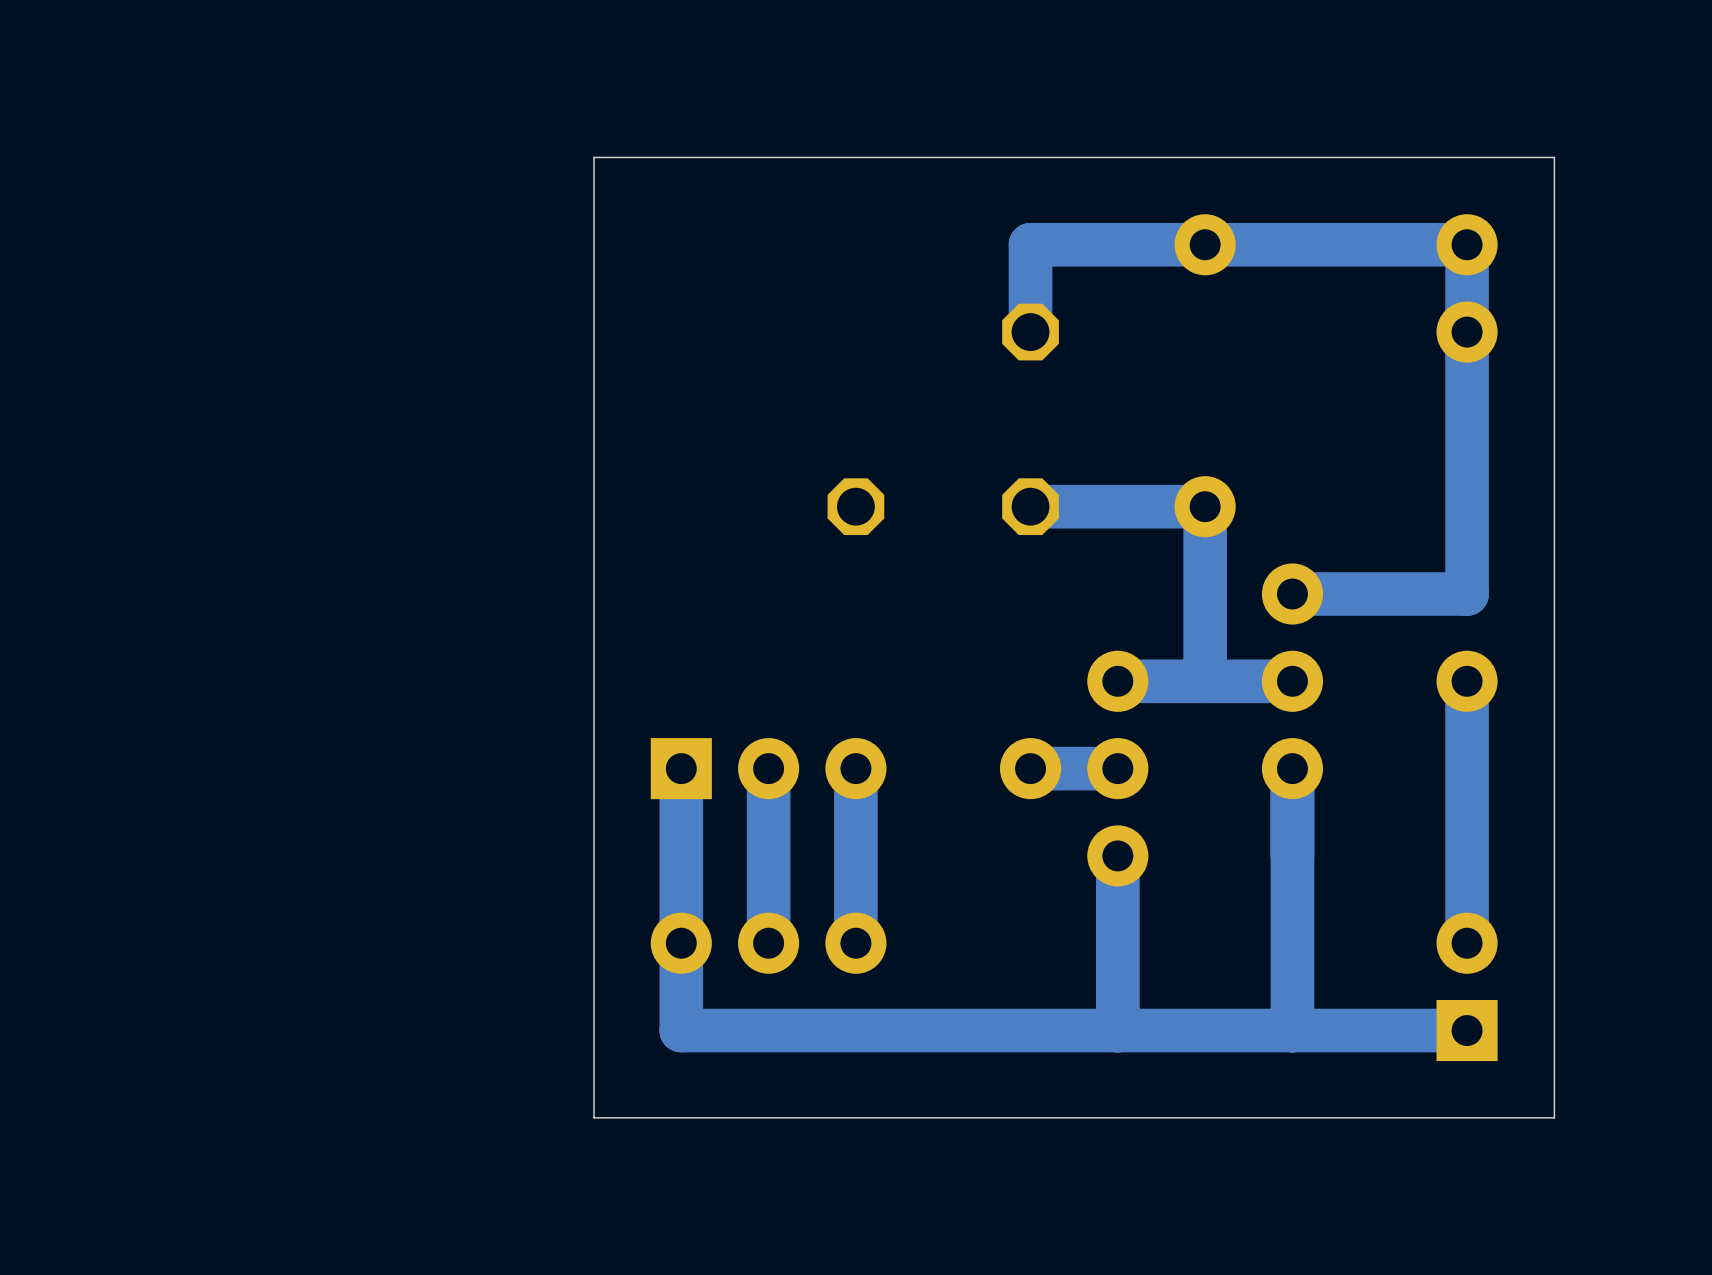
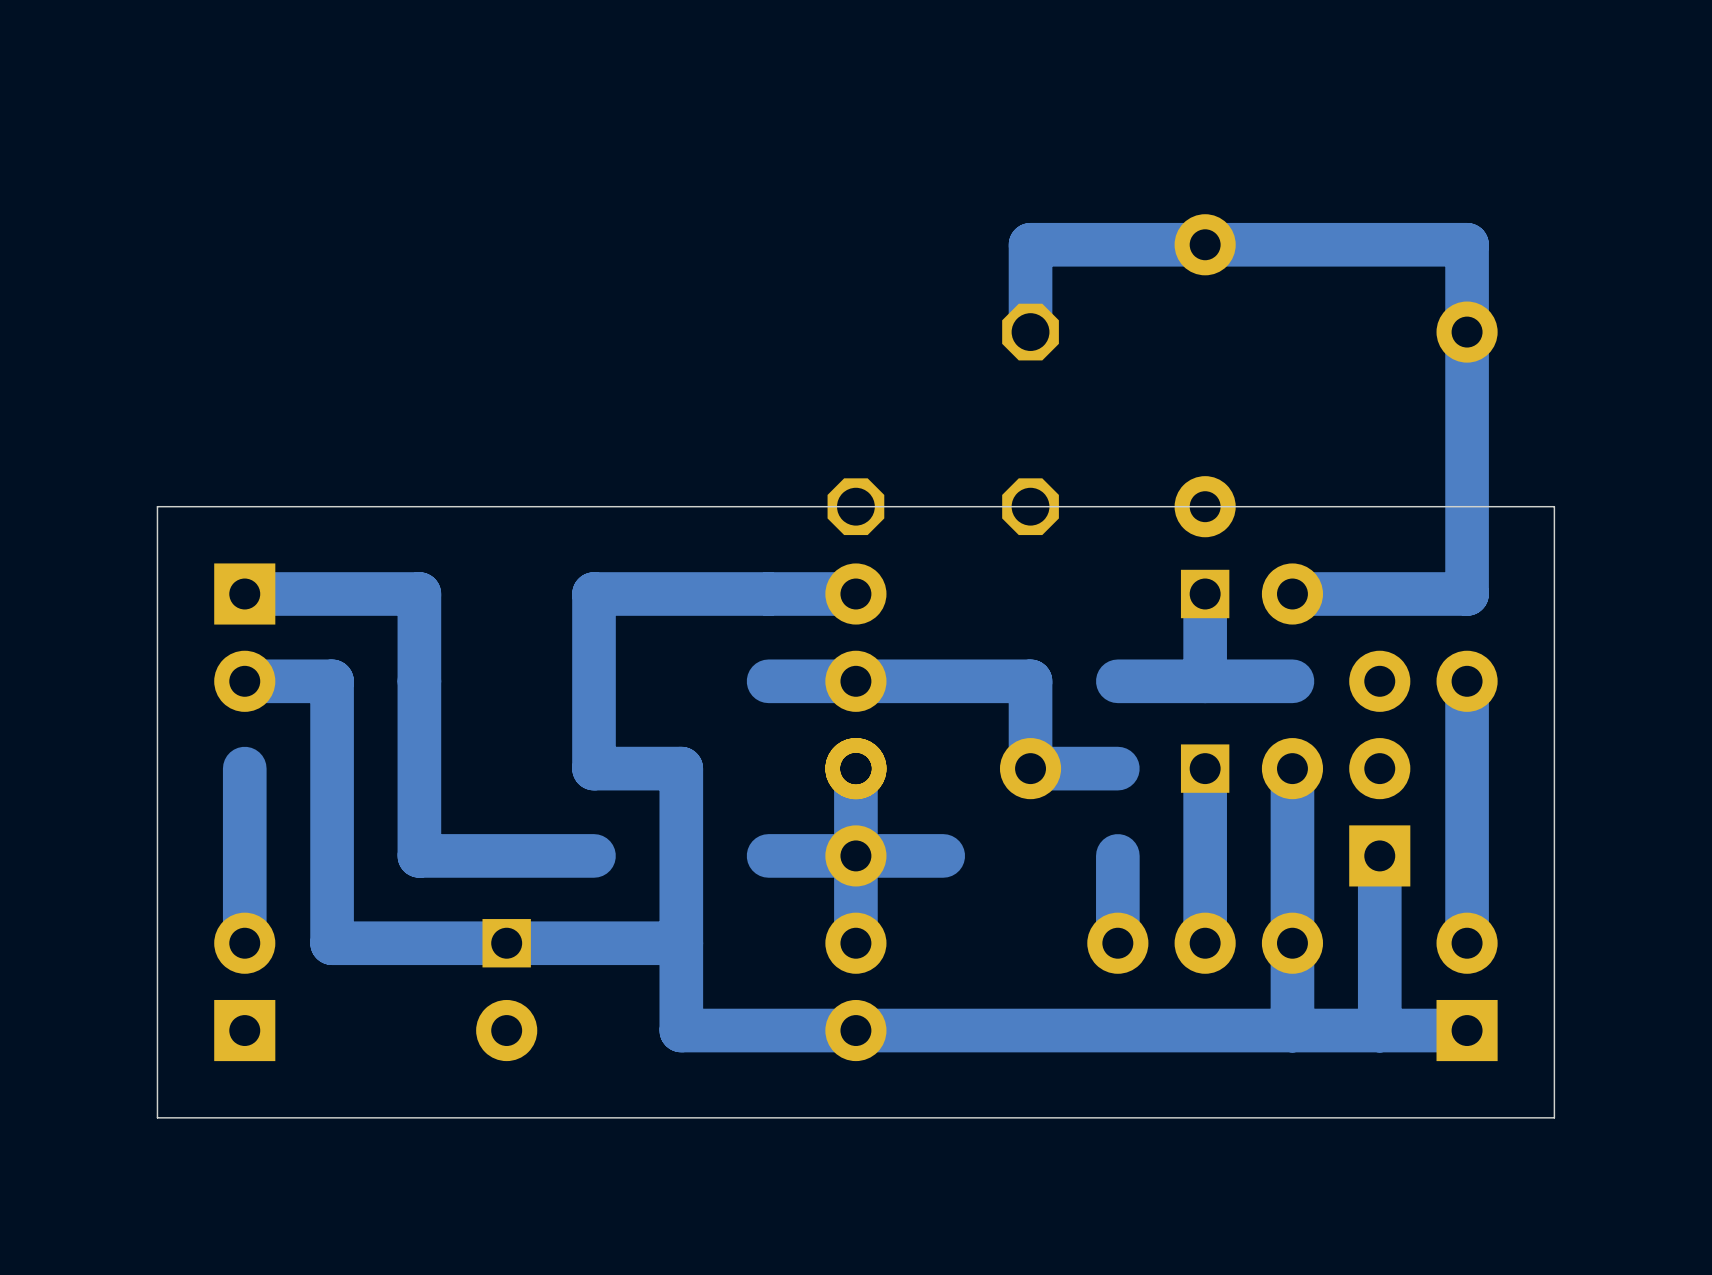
part: (1467, 244) -> none
bottom track: (1030, 506) (1205, 506) (1205, 593) -> none
board edge: (1554, 506) (1554, 157) (593, 157) (593, 1117) -> (1554, 506) (157, 506) (157, 1117) (593, 1117)
bottom track: none -> (244, 593) (419, 593) (419, 855) (593, 855)
bottom track: none -> (855, 593) (593, 593) (593, 768) (681, 768)
part: none -> (1251, 593)
part: none -> (244, 637)
bottom track: none -> (244, 681) (332, 681) (332, 943) (681, 943)
bottom track: none -> (768, 681) (1030, 681) (1030, 768)
part: none -> (855, 681)
part: (1292, 681) -> none
bottom track: none -> (244, 768) (244, 943)
part: (724, 768) -> none
bottom track: (768, 768) (768, 943) -> (1205, 768) (1205, 943)
part: (1117, 768) -> none
part: none -> (1251, 768)
part: none -> (1379, 768)
bottom track: none -> (943, 855) (768, 855)
bottom track: none -> (1379, 855) (1379, 1030)
part rotation: 0° (768, 943) -> 90° clockwise (855, 943)
bottom track: (1117, 943) (1117, 1030) -> none
part: none -> (1205, 943)
part: none -> (244, 986)
part: none -> (506, 990)

